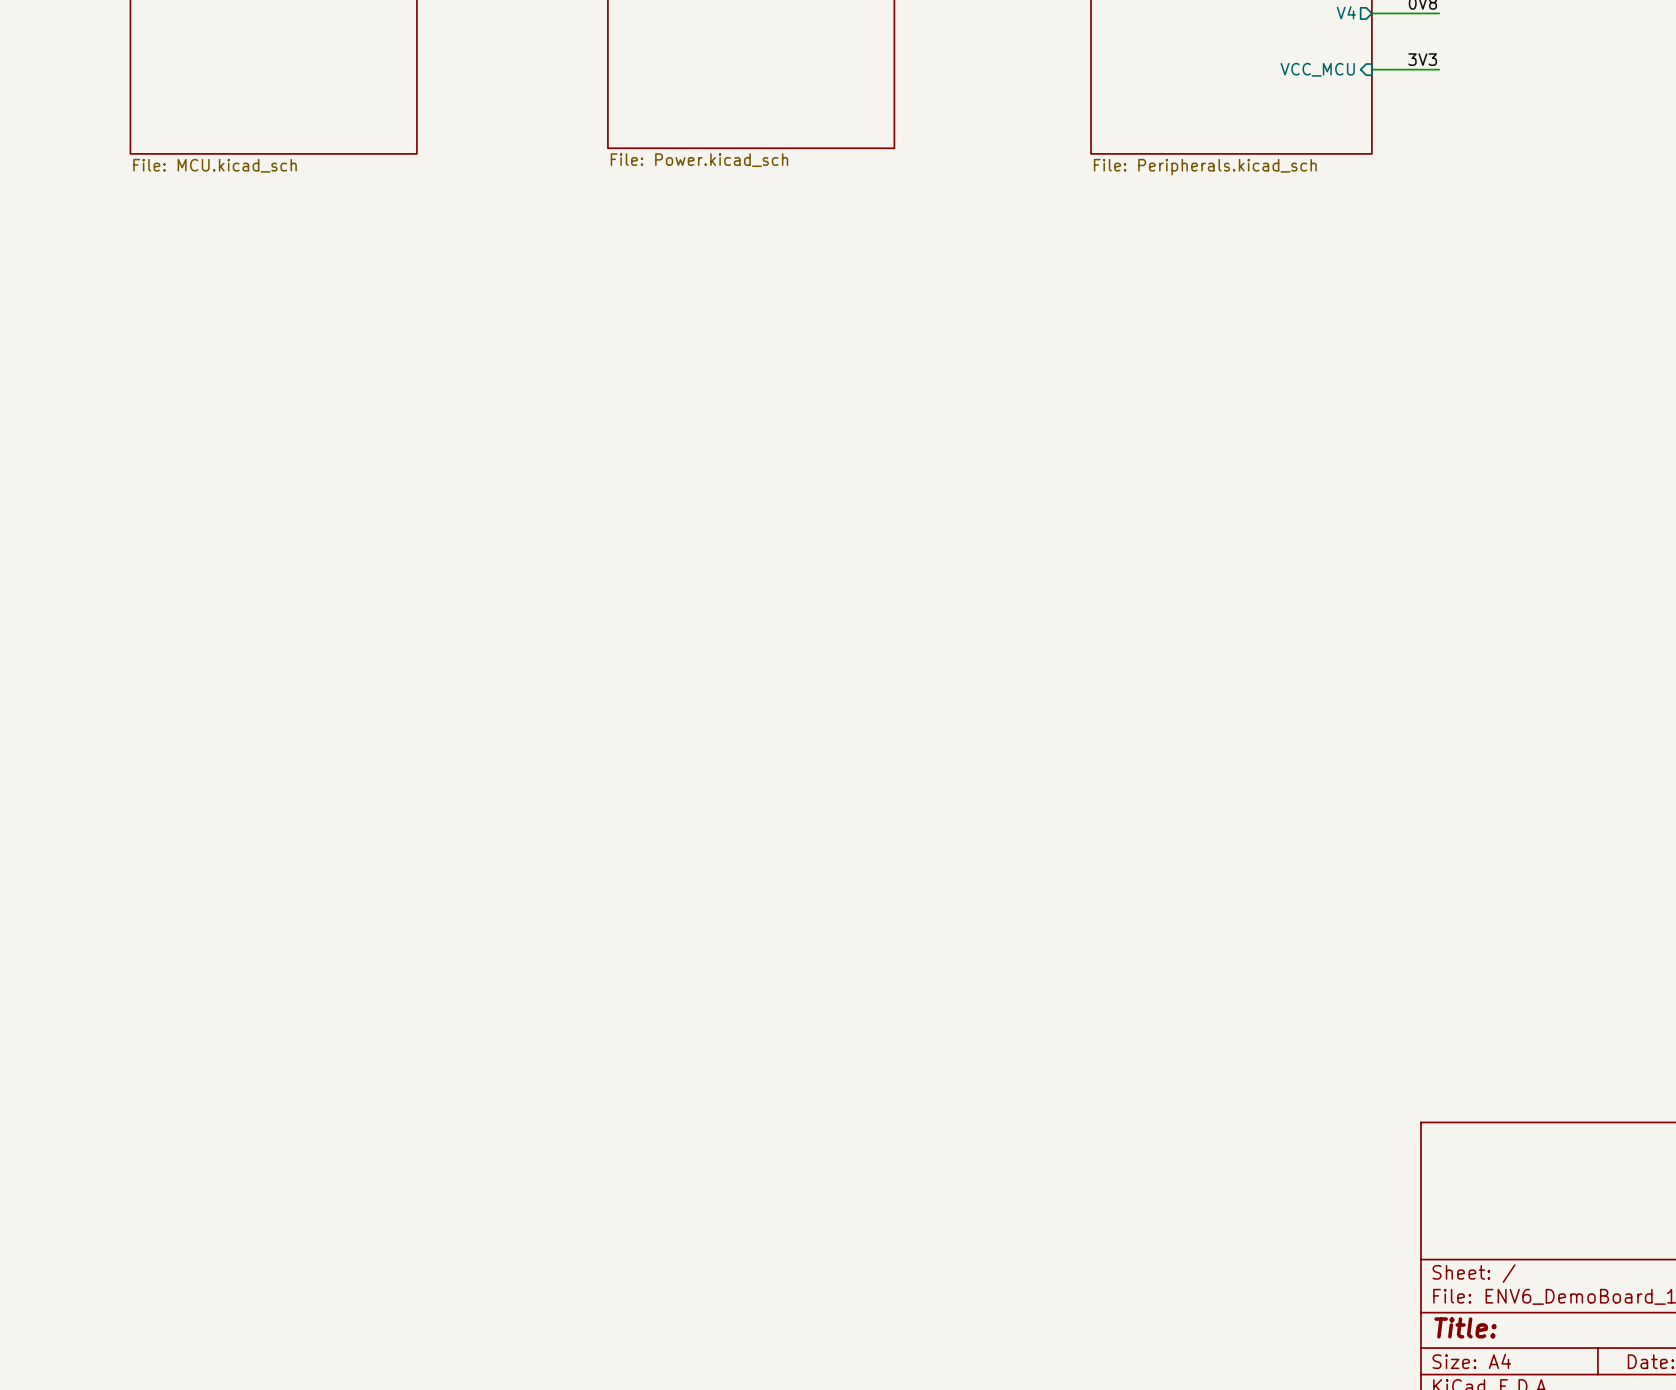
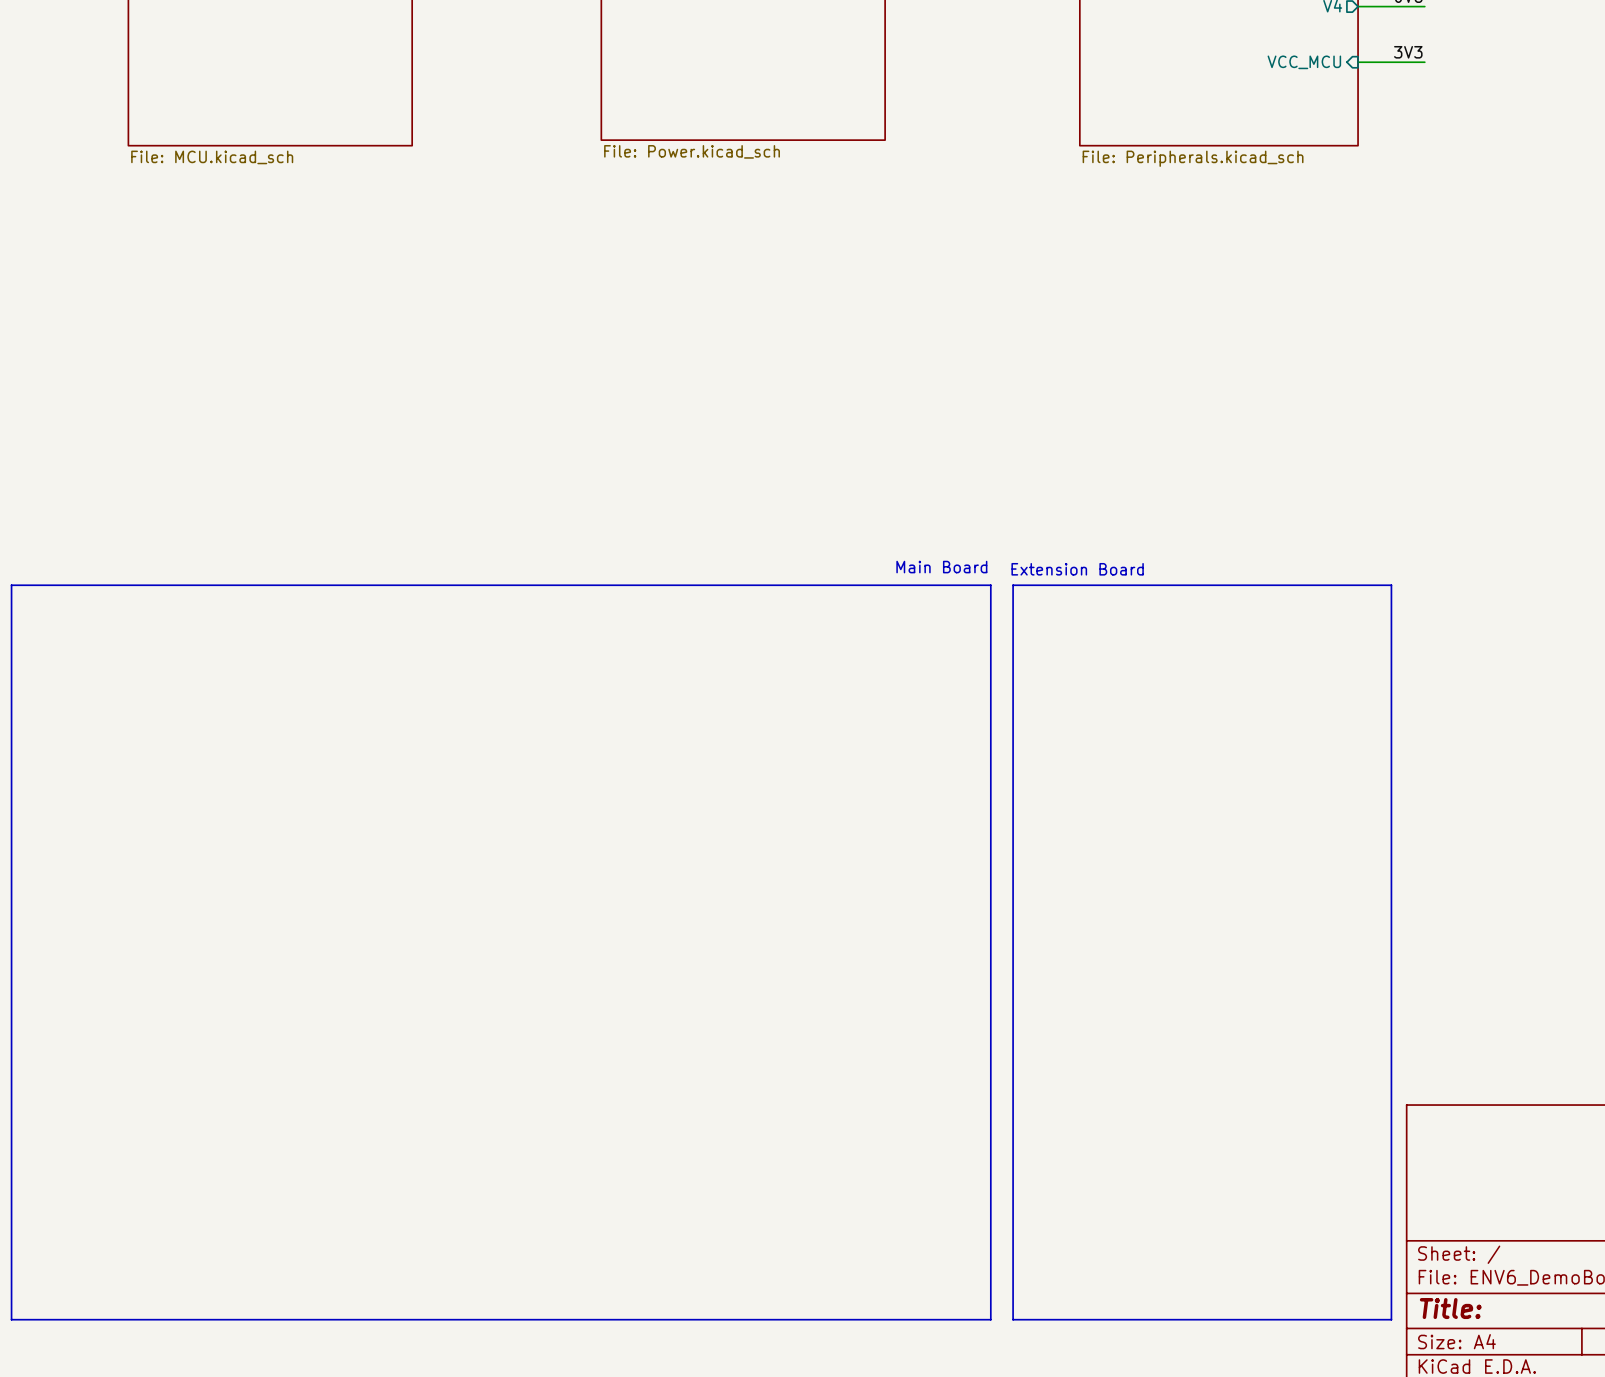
text: none -> Main Board (941, 567)
text: none -> Extension Board (1077, 569)
line: none -> (11, 585) (990, 585) (990, 1319) (11, 1319) (11, 585)
line: none -> (1013, 585) (1391, 585) (1391, 1319) (1013, 1319) (1013, 585)

